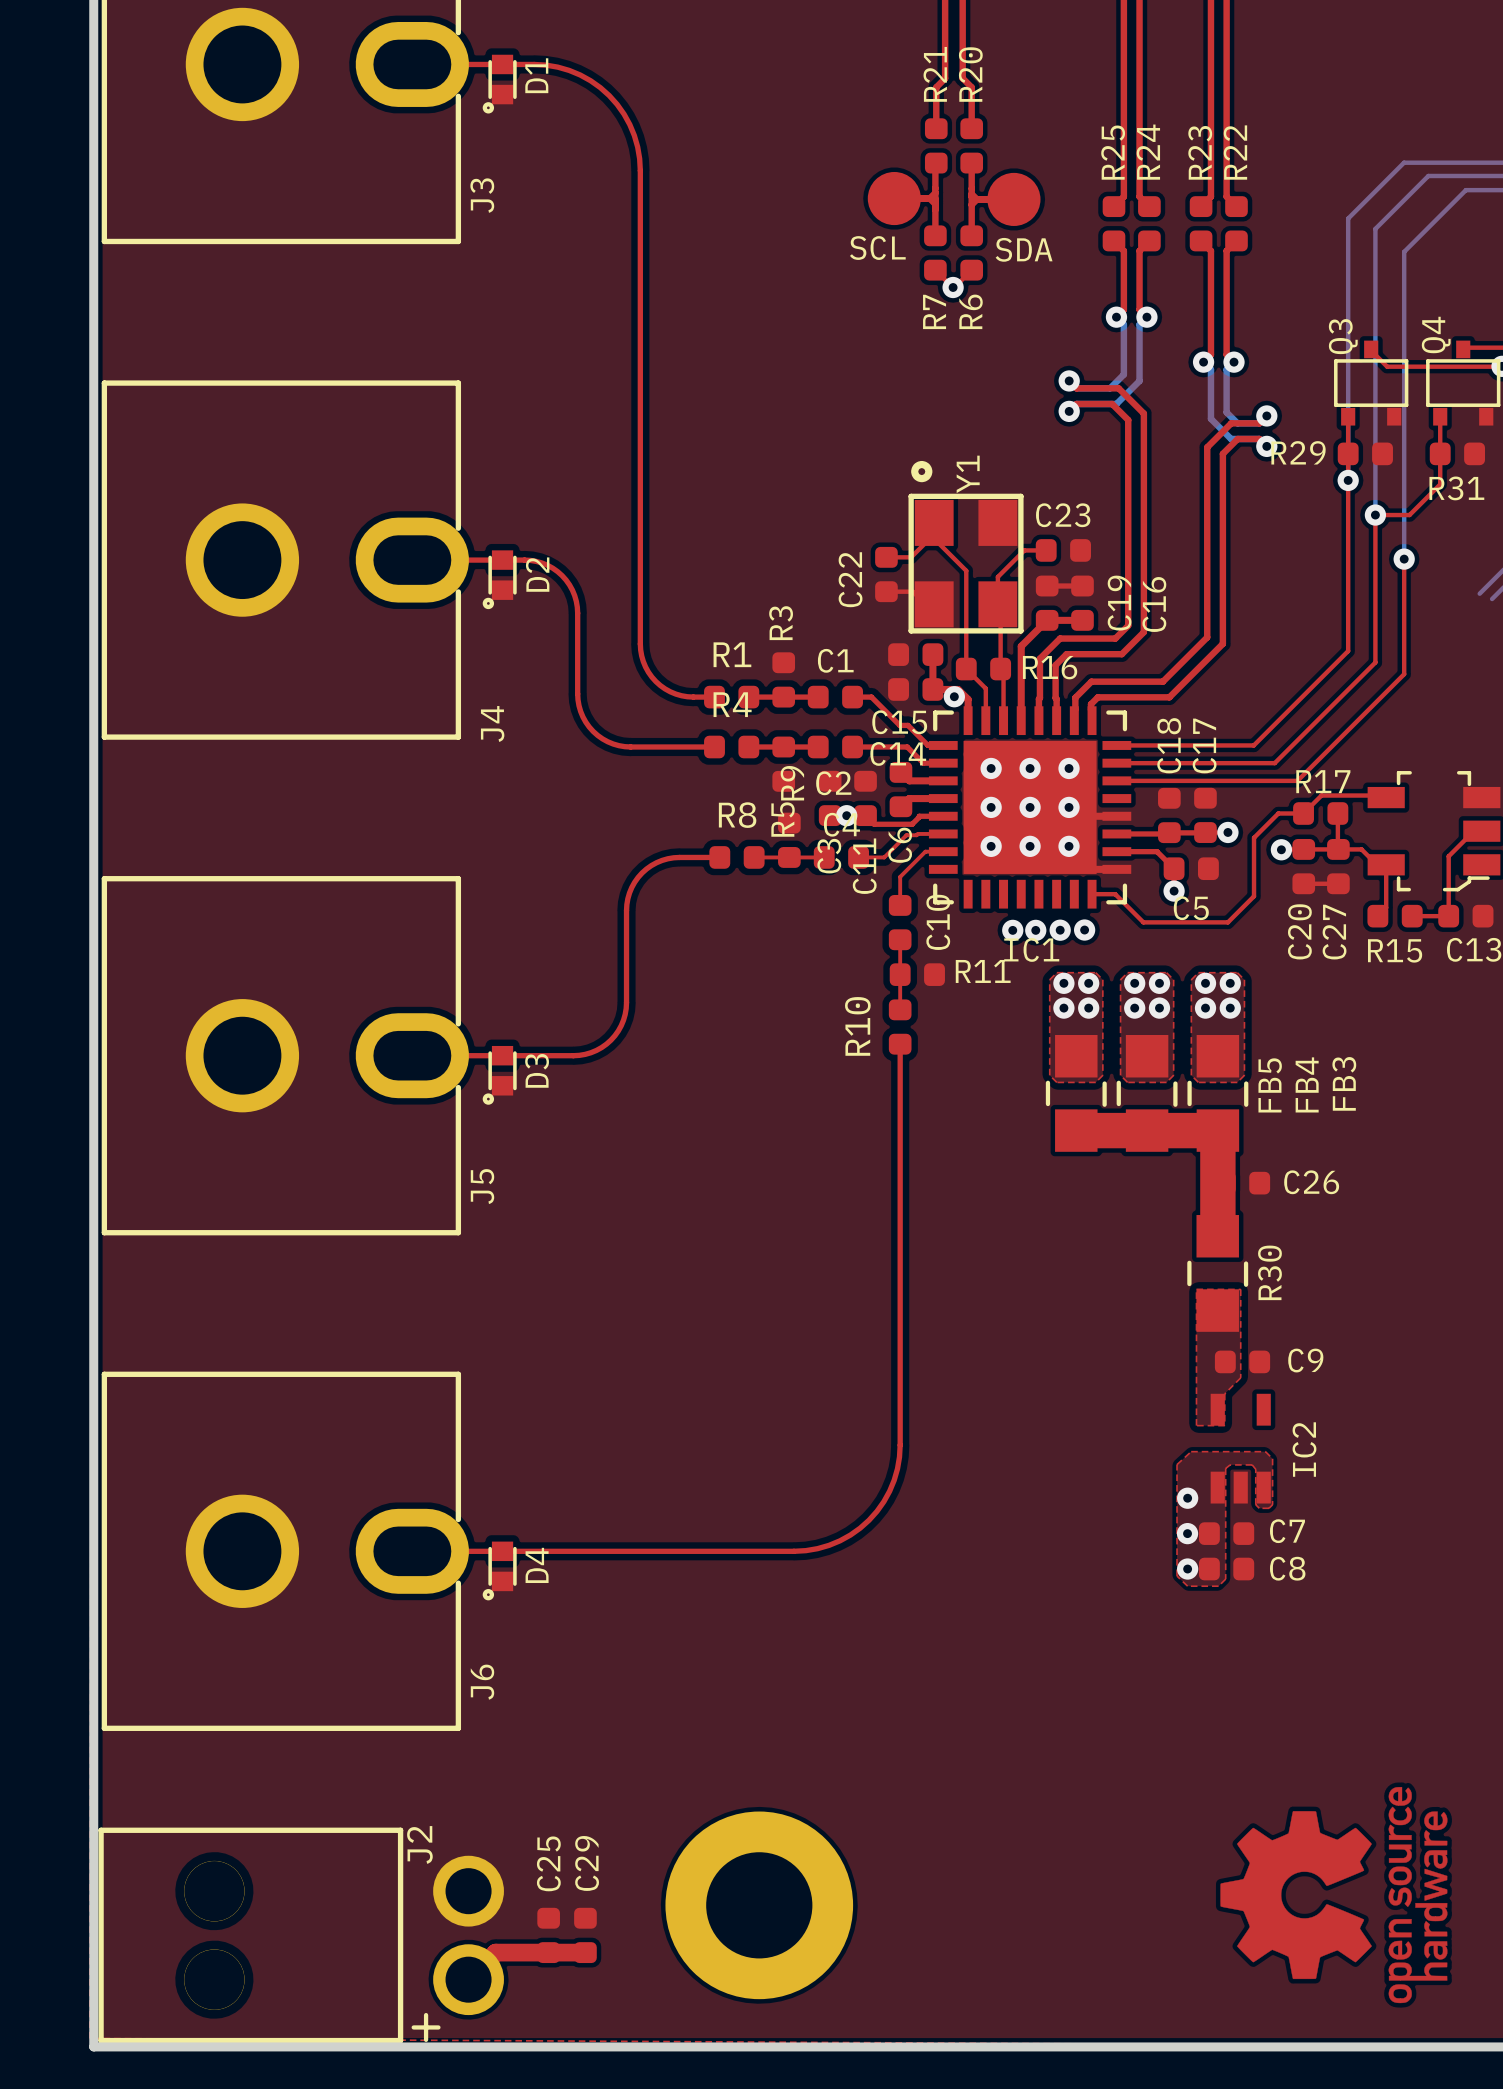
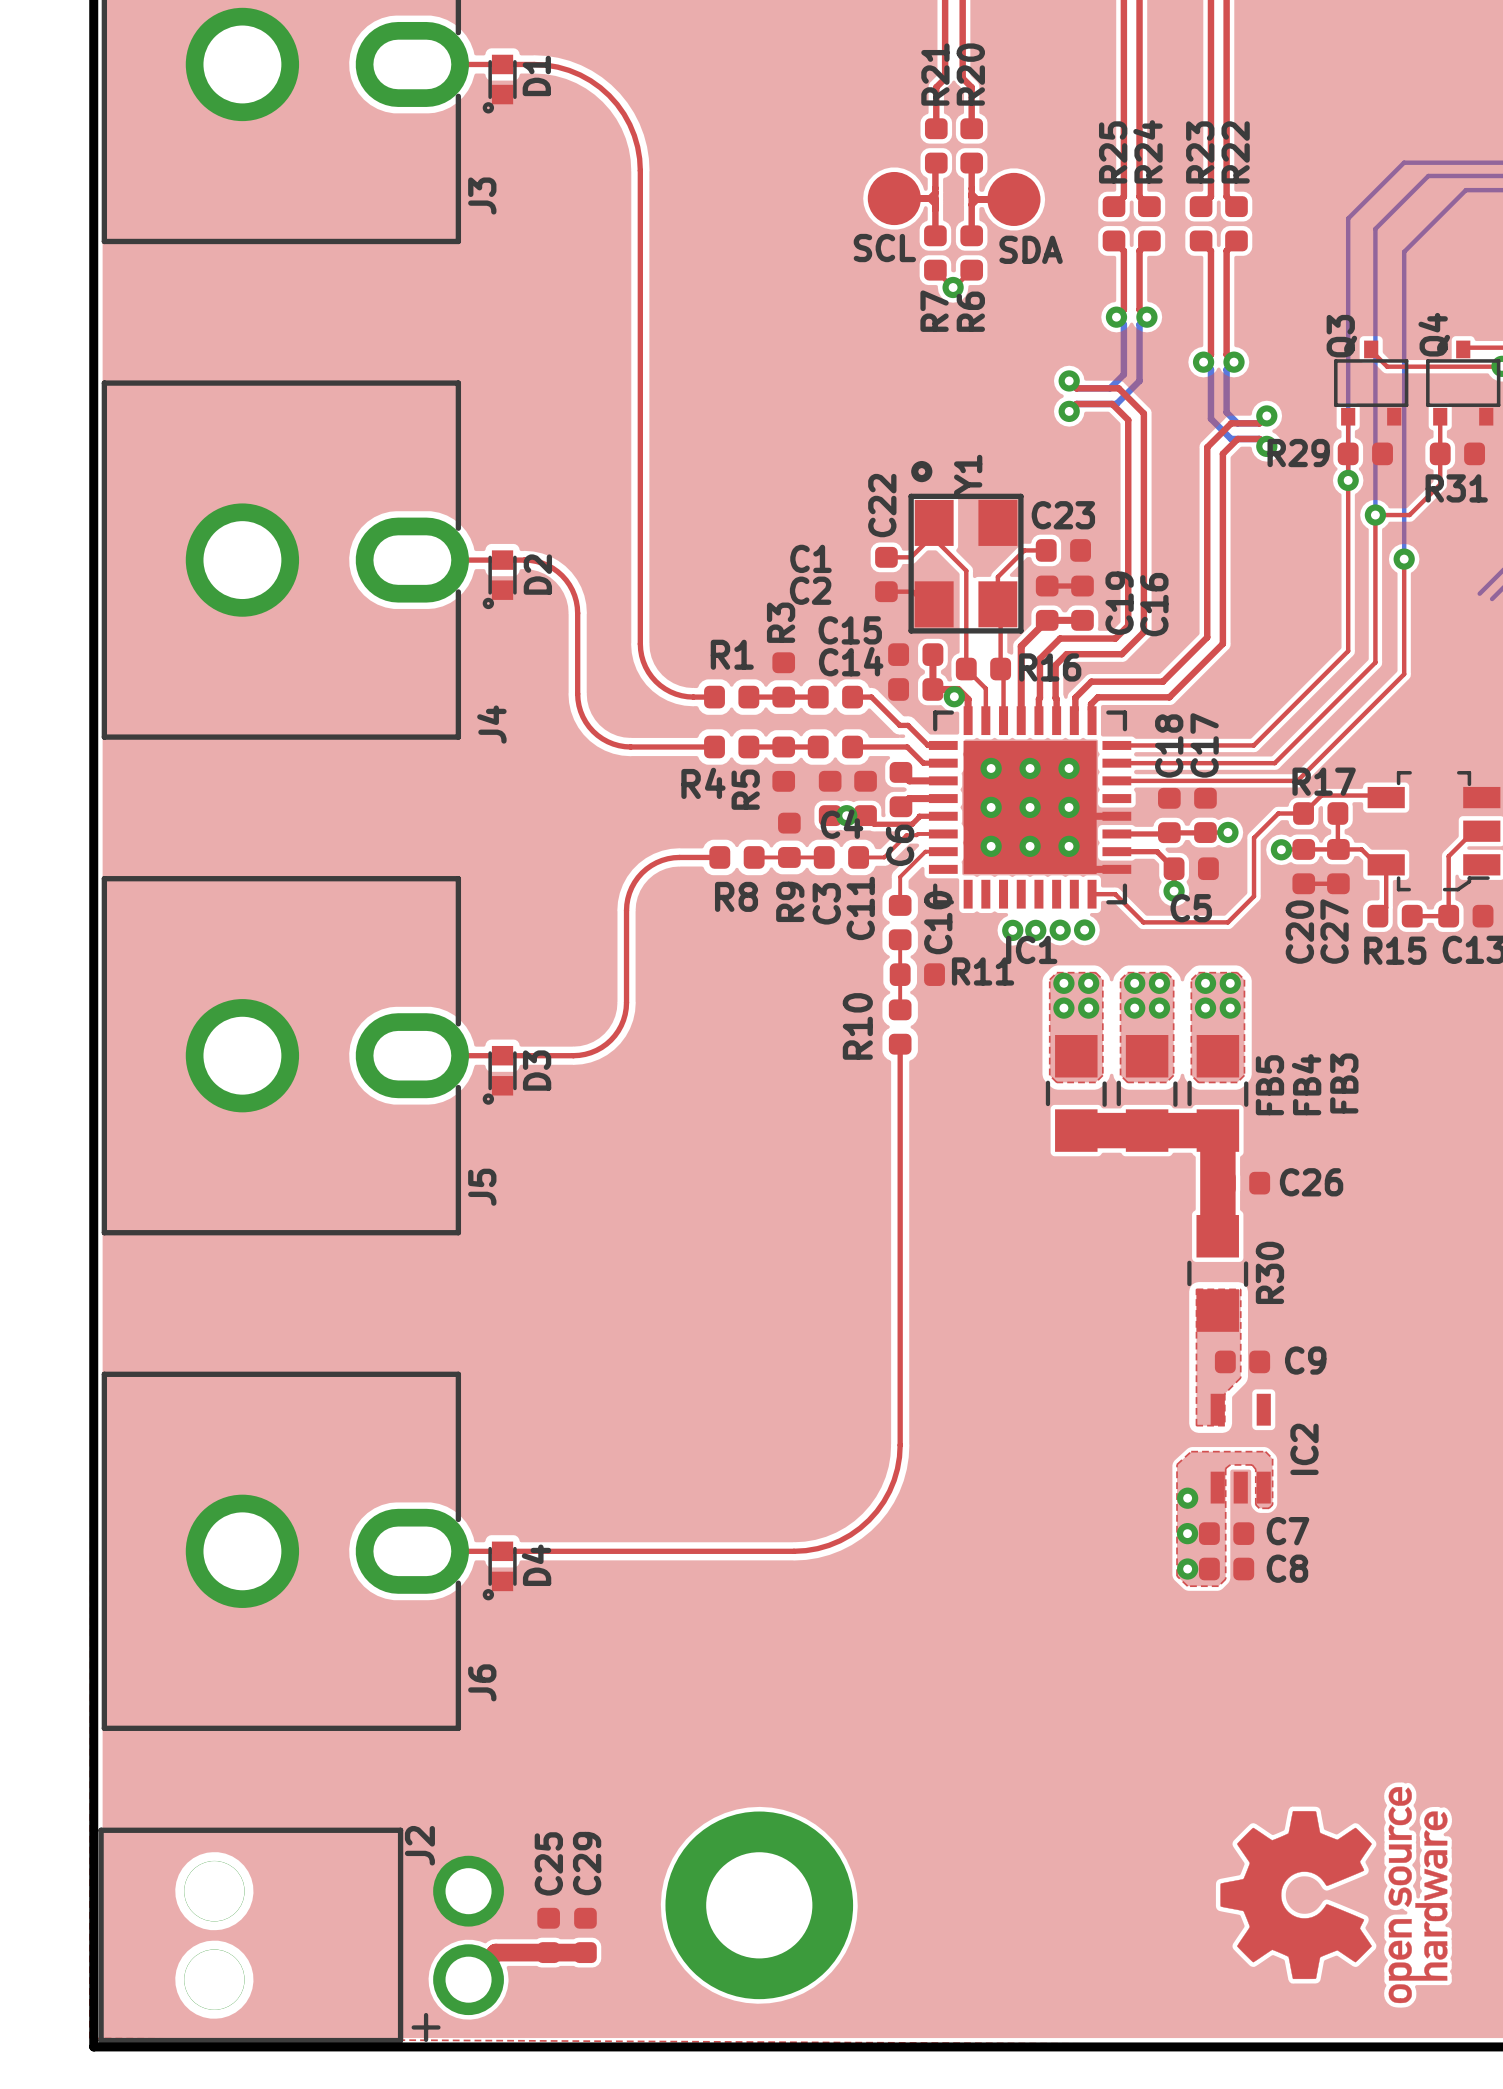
C22 name position: C22 (850, 579) -> C22 (882, 505)
C1 name position: C1 (835, 660) -> C1 (810, 558)
R4 name position: R4 (732, 704) -> R4 (703, 783)
C15 name position: C15 (899, 722) -> C15 (850, 630)
C14 name position: C14 (898, 753) -> C14 (851, 661)
R9 name position: R9 (792, 783) -> R9 (790, 901)
C2 name position: C2 (833, 783) -> C2 (810, 590)
R8 name position: R8 (737, 815) -> R8 (736, 896)
R5 name position: R5 (783, 819) -> R5 (745, 789)
C3 name position: C3 (829, 856) -> C3 (826, 903)
C11 name position: C11 (864, 866) -> C11 (860, 908)

